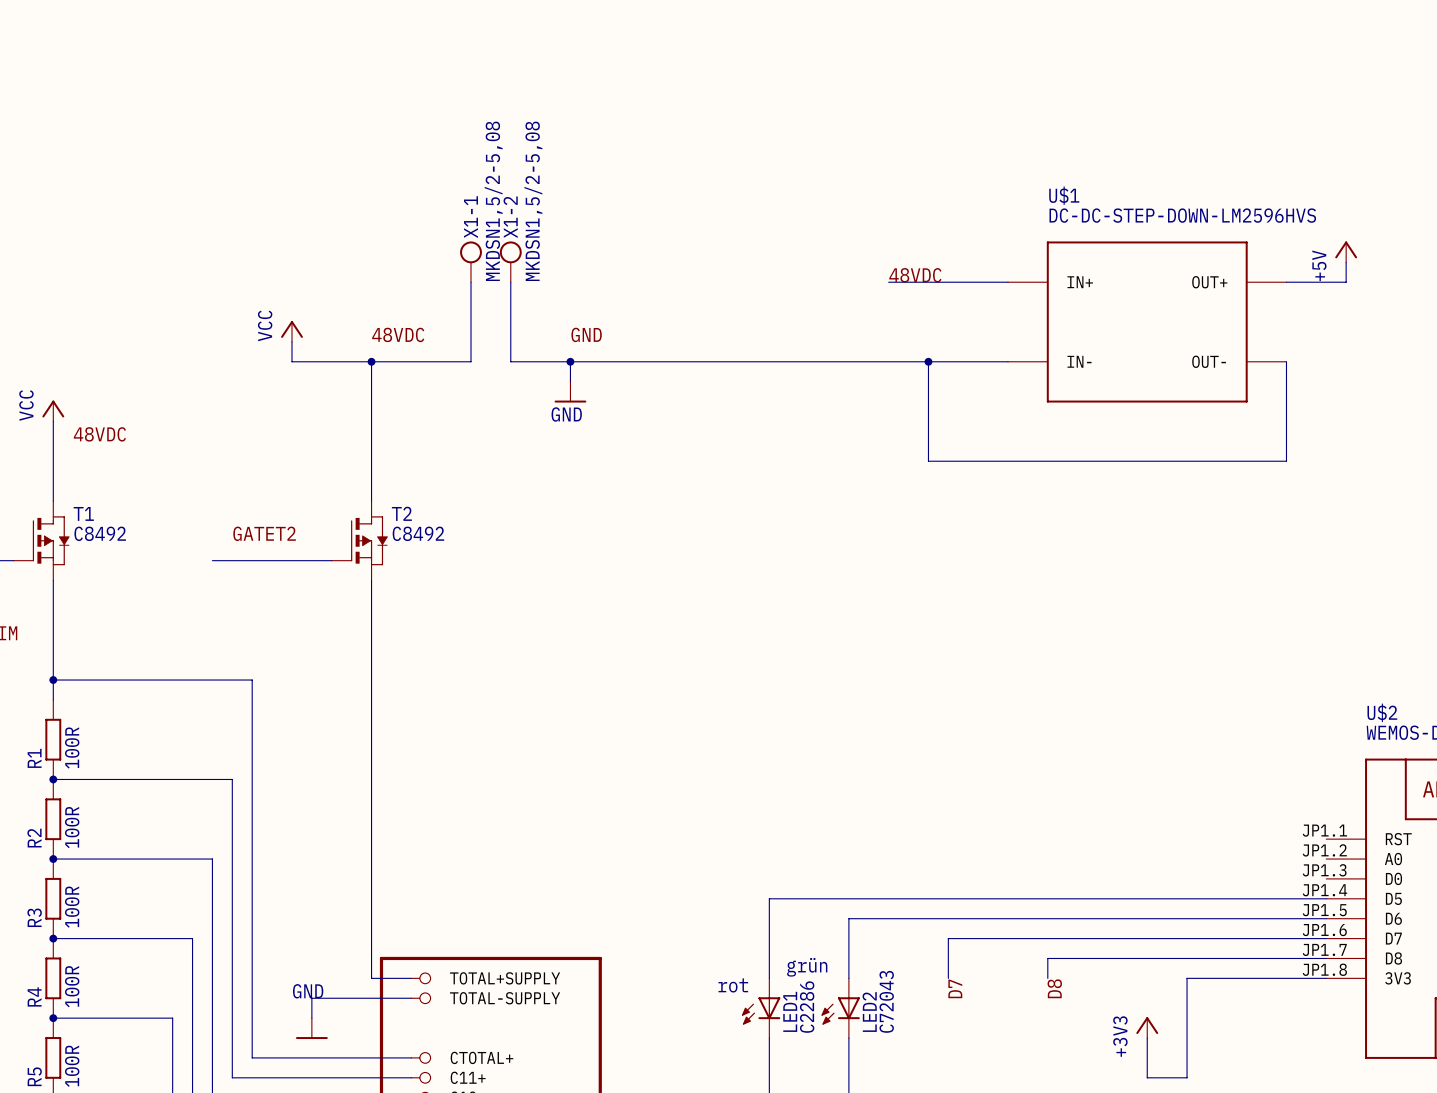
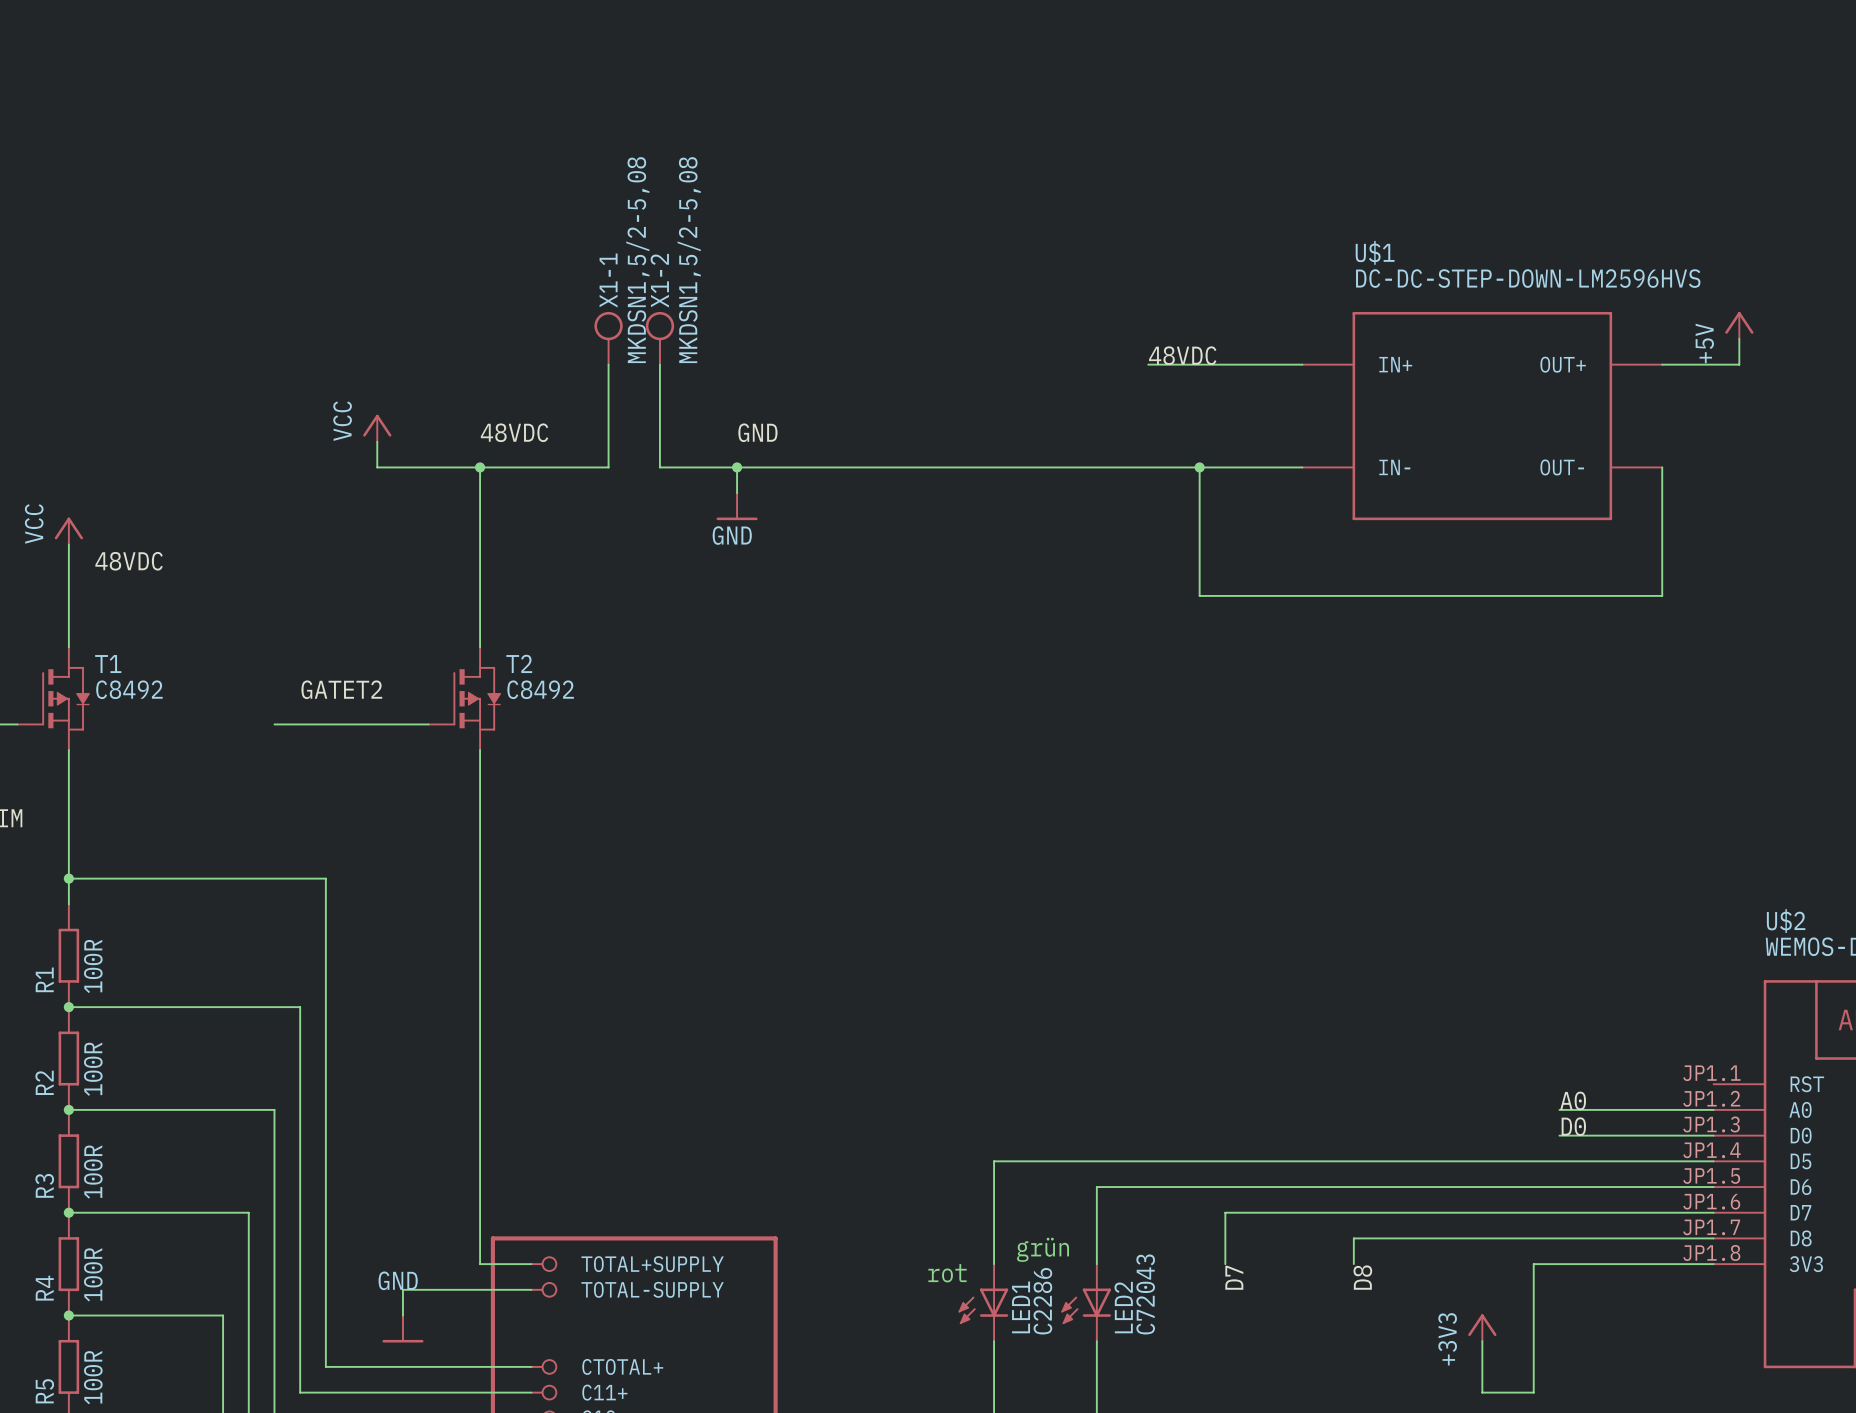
label: none -> A0 (1573, 1100)
wire: none -> (1559, 1109) (1713, 1109)
label: none -> D0 (1573, 1126)
wire: none -> (1559, 1135) (1713, 1135)

